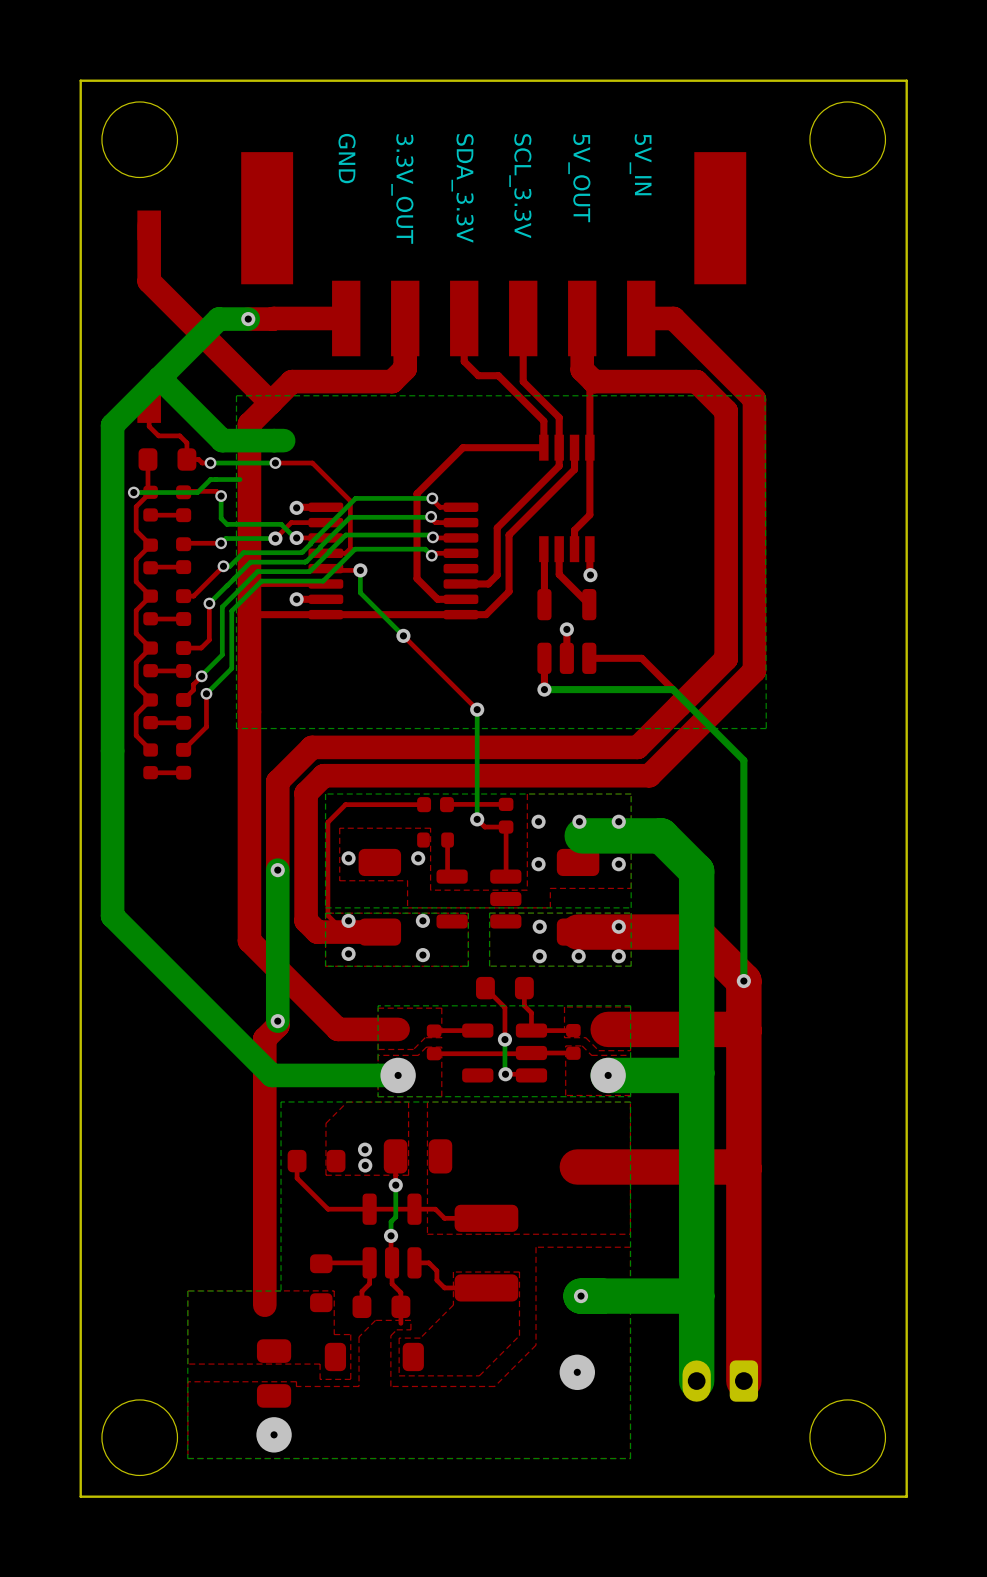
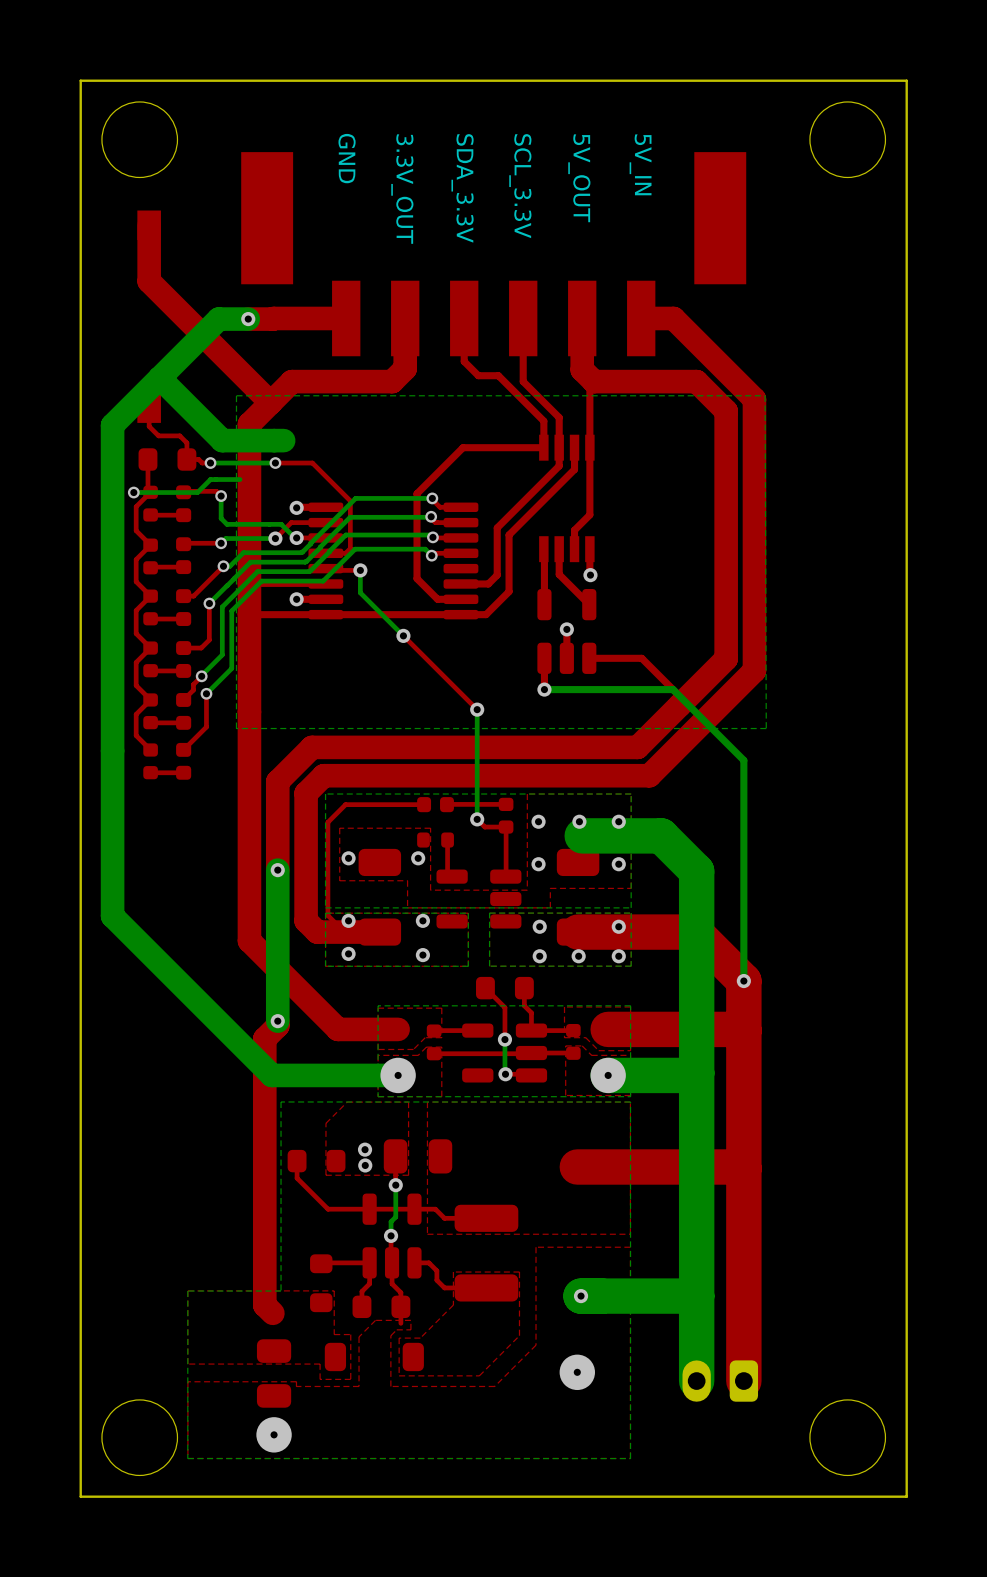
top track: none -> (264, 1305) (272, 1313)

